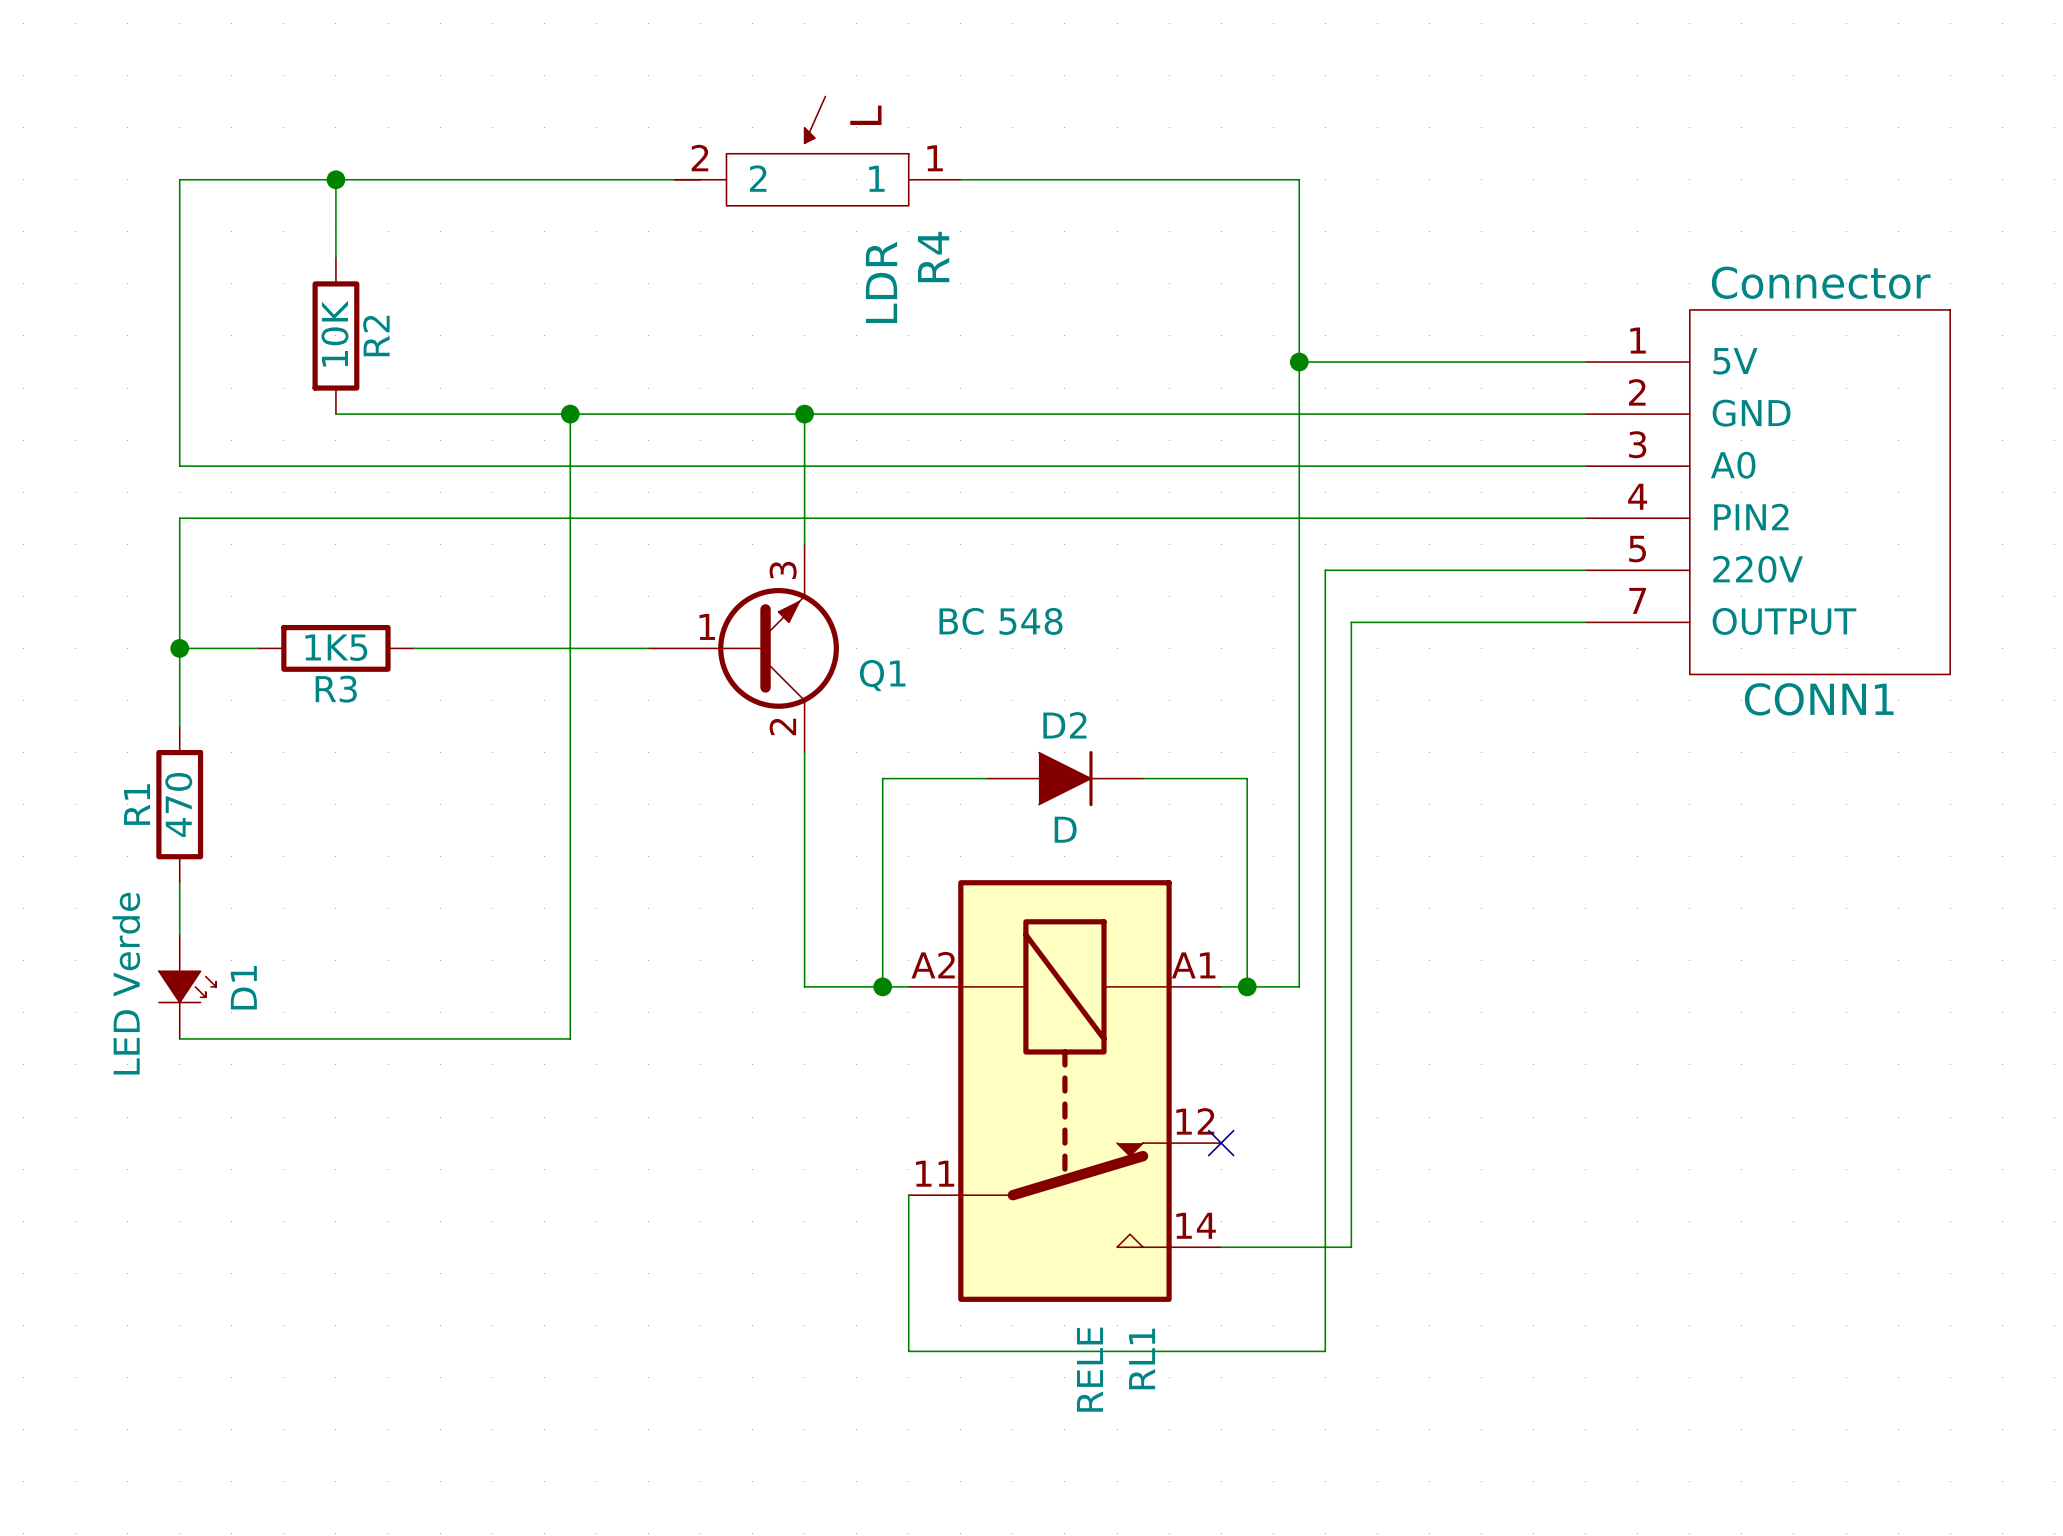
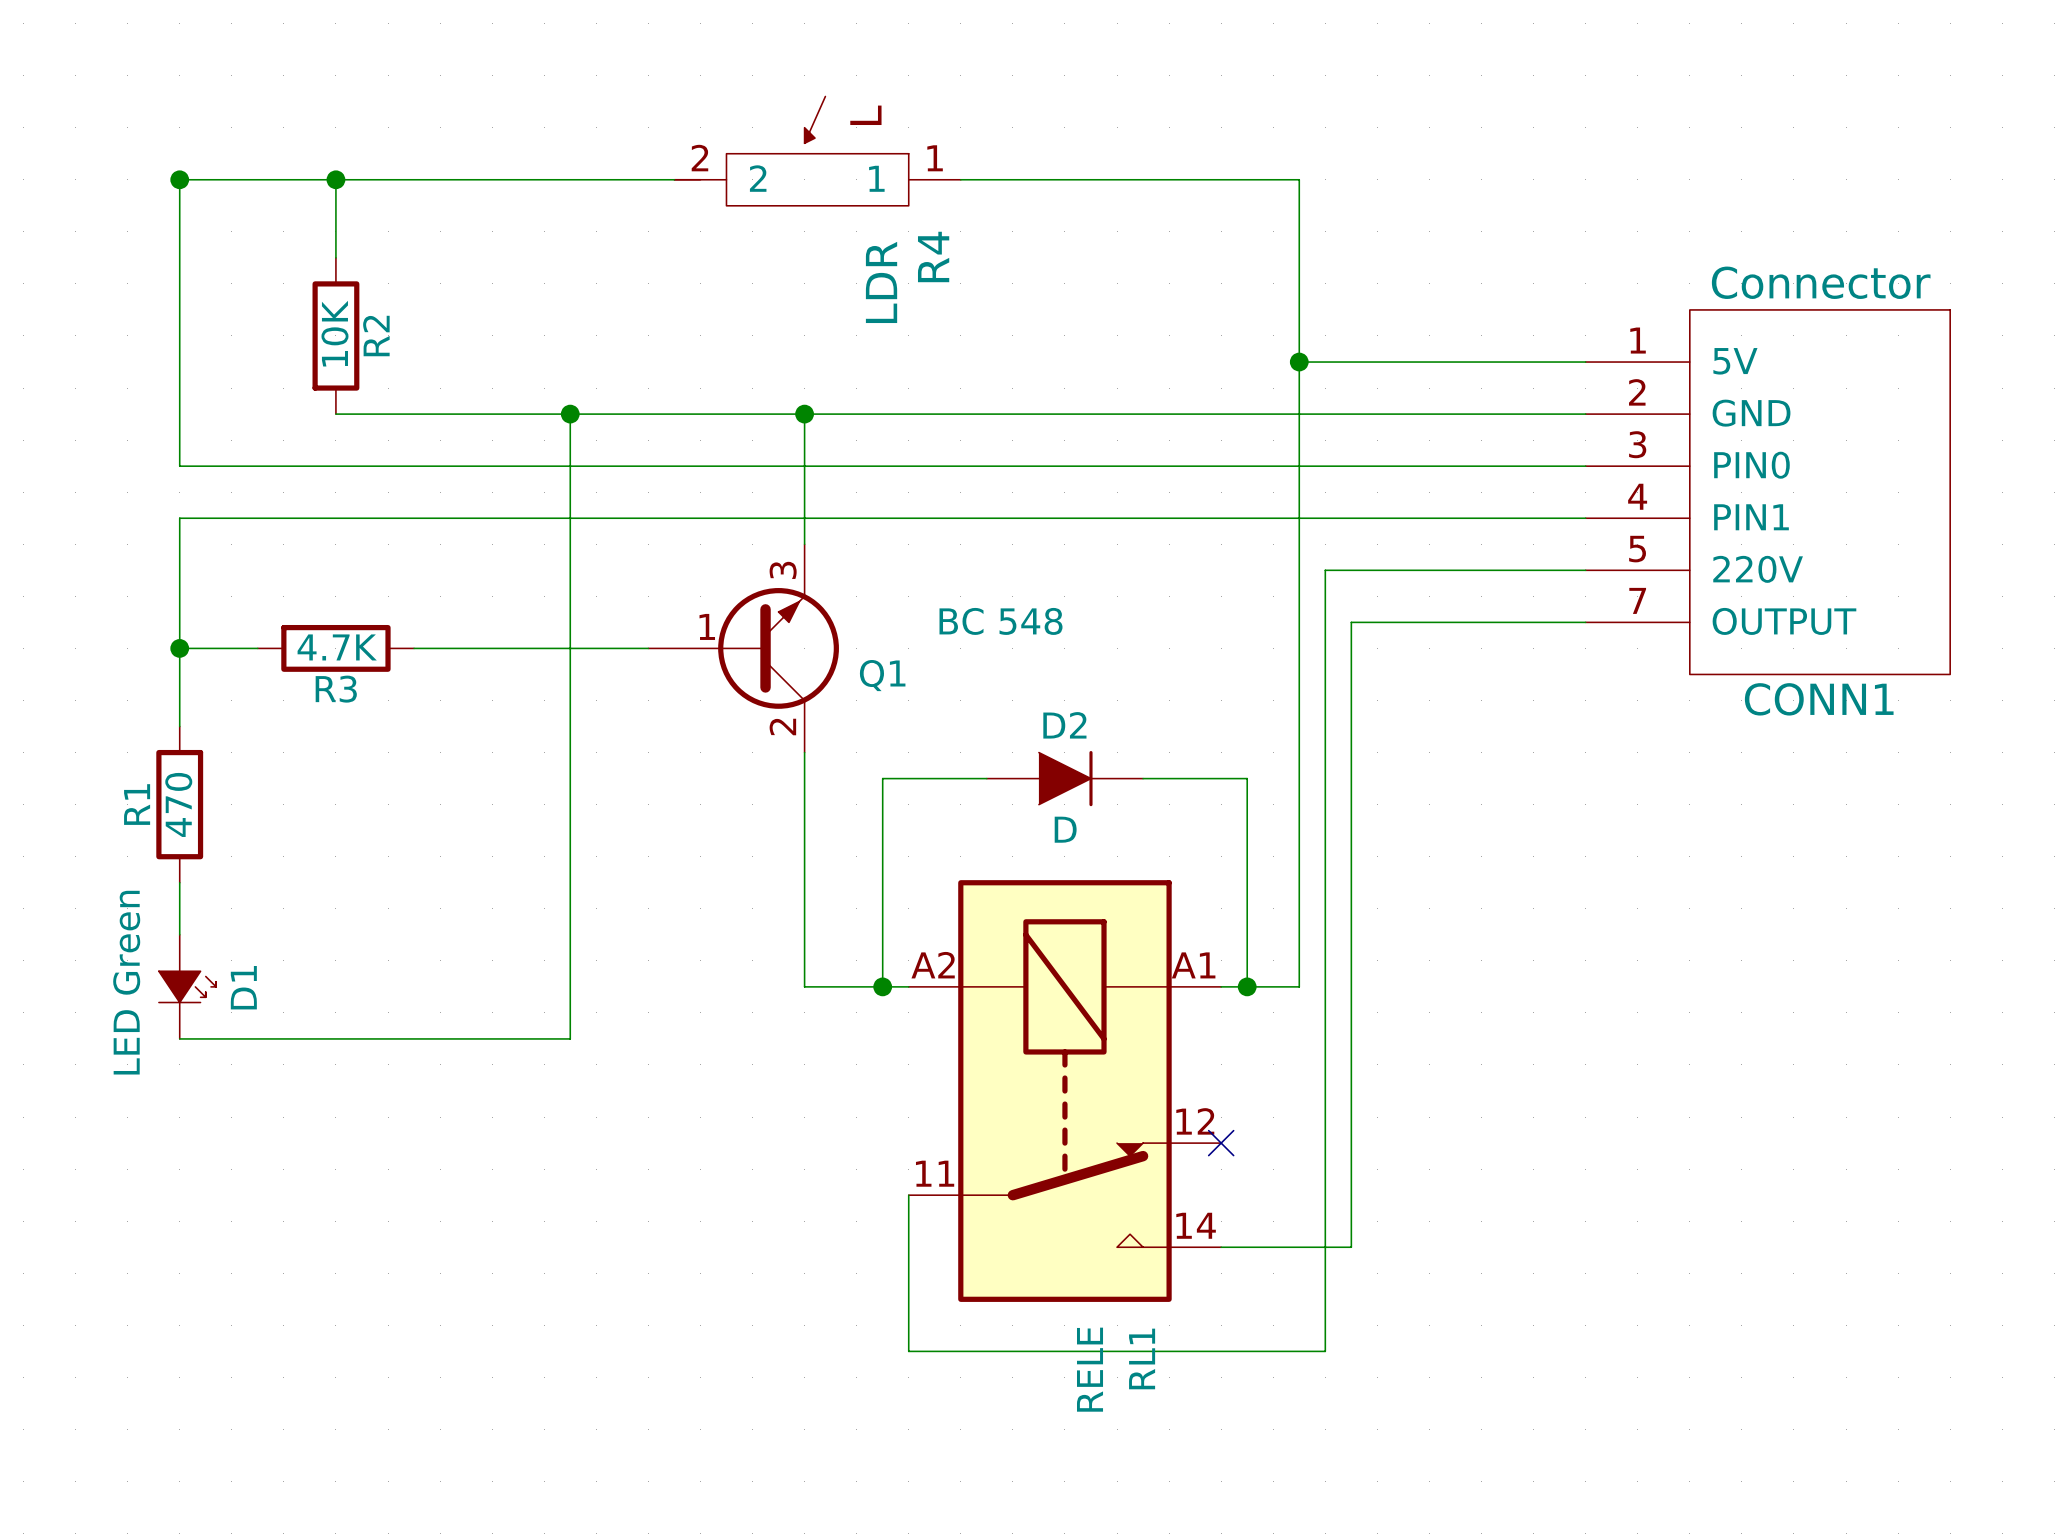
junction: none -> (179, 179)
CONN1 pin name: A0 (1733, 465) -> PIN0 (1751, 465)
CONN1 pin name: PIN2 (1751, 517) -> PIN1 (1751, 517)
R3 value: 1K5 (336, 647) -> 4.7K (337, 647)
D1 value: LED Verde (126, 983) -> LED Green (126, 982)

